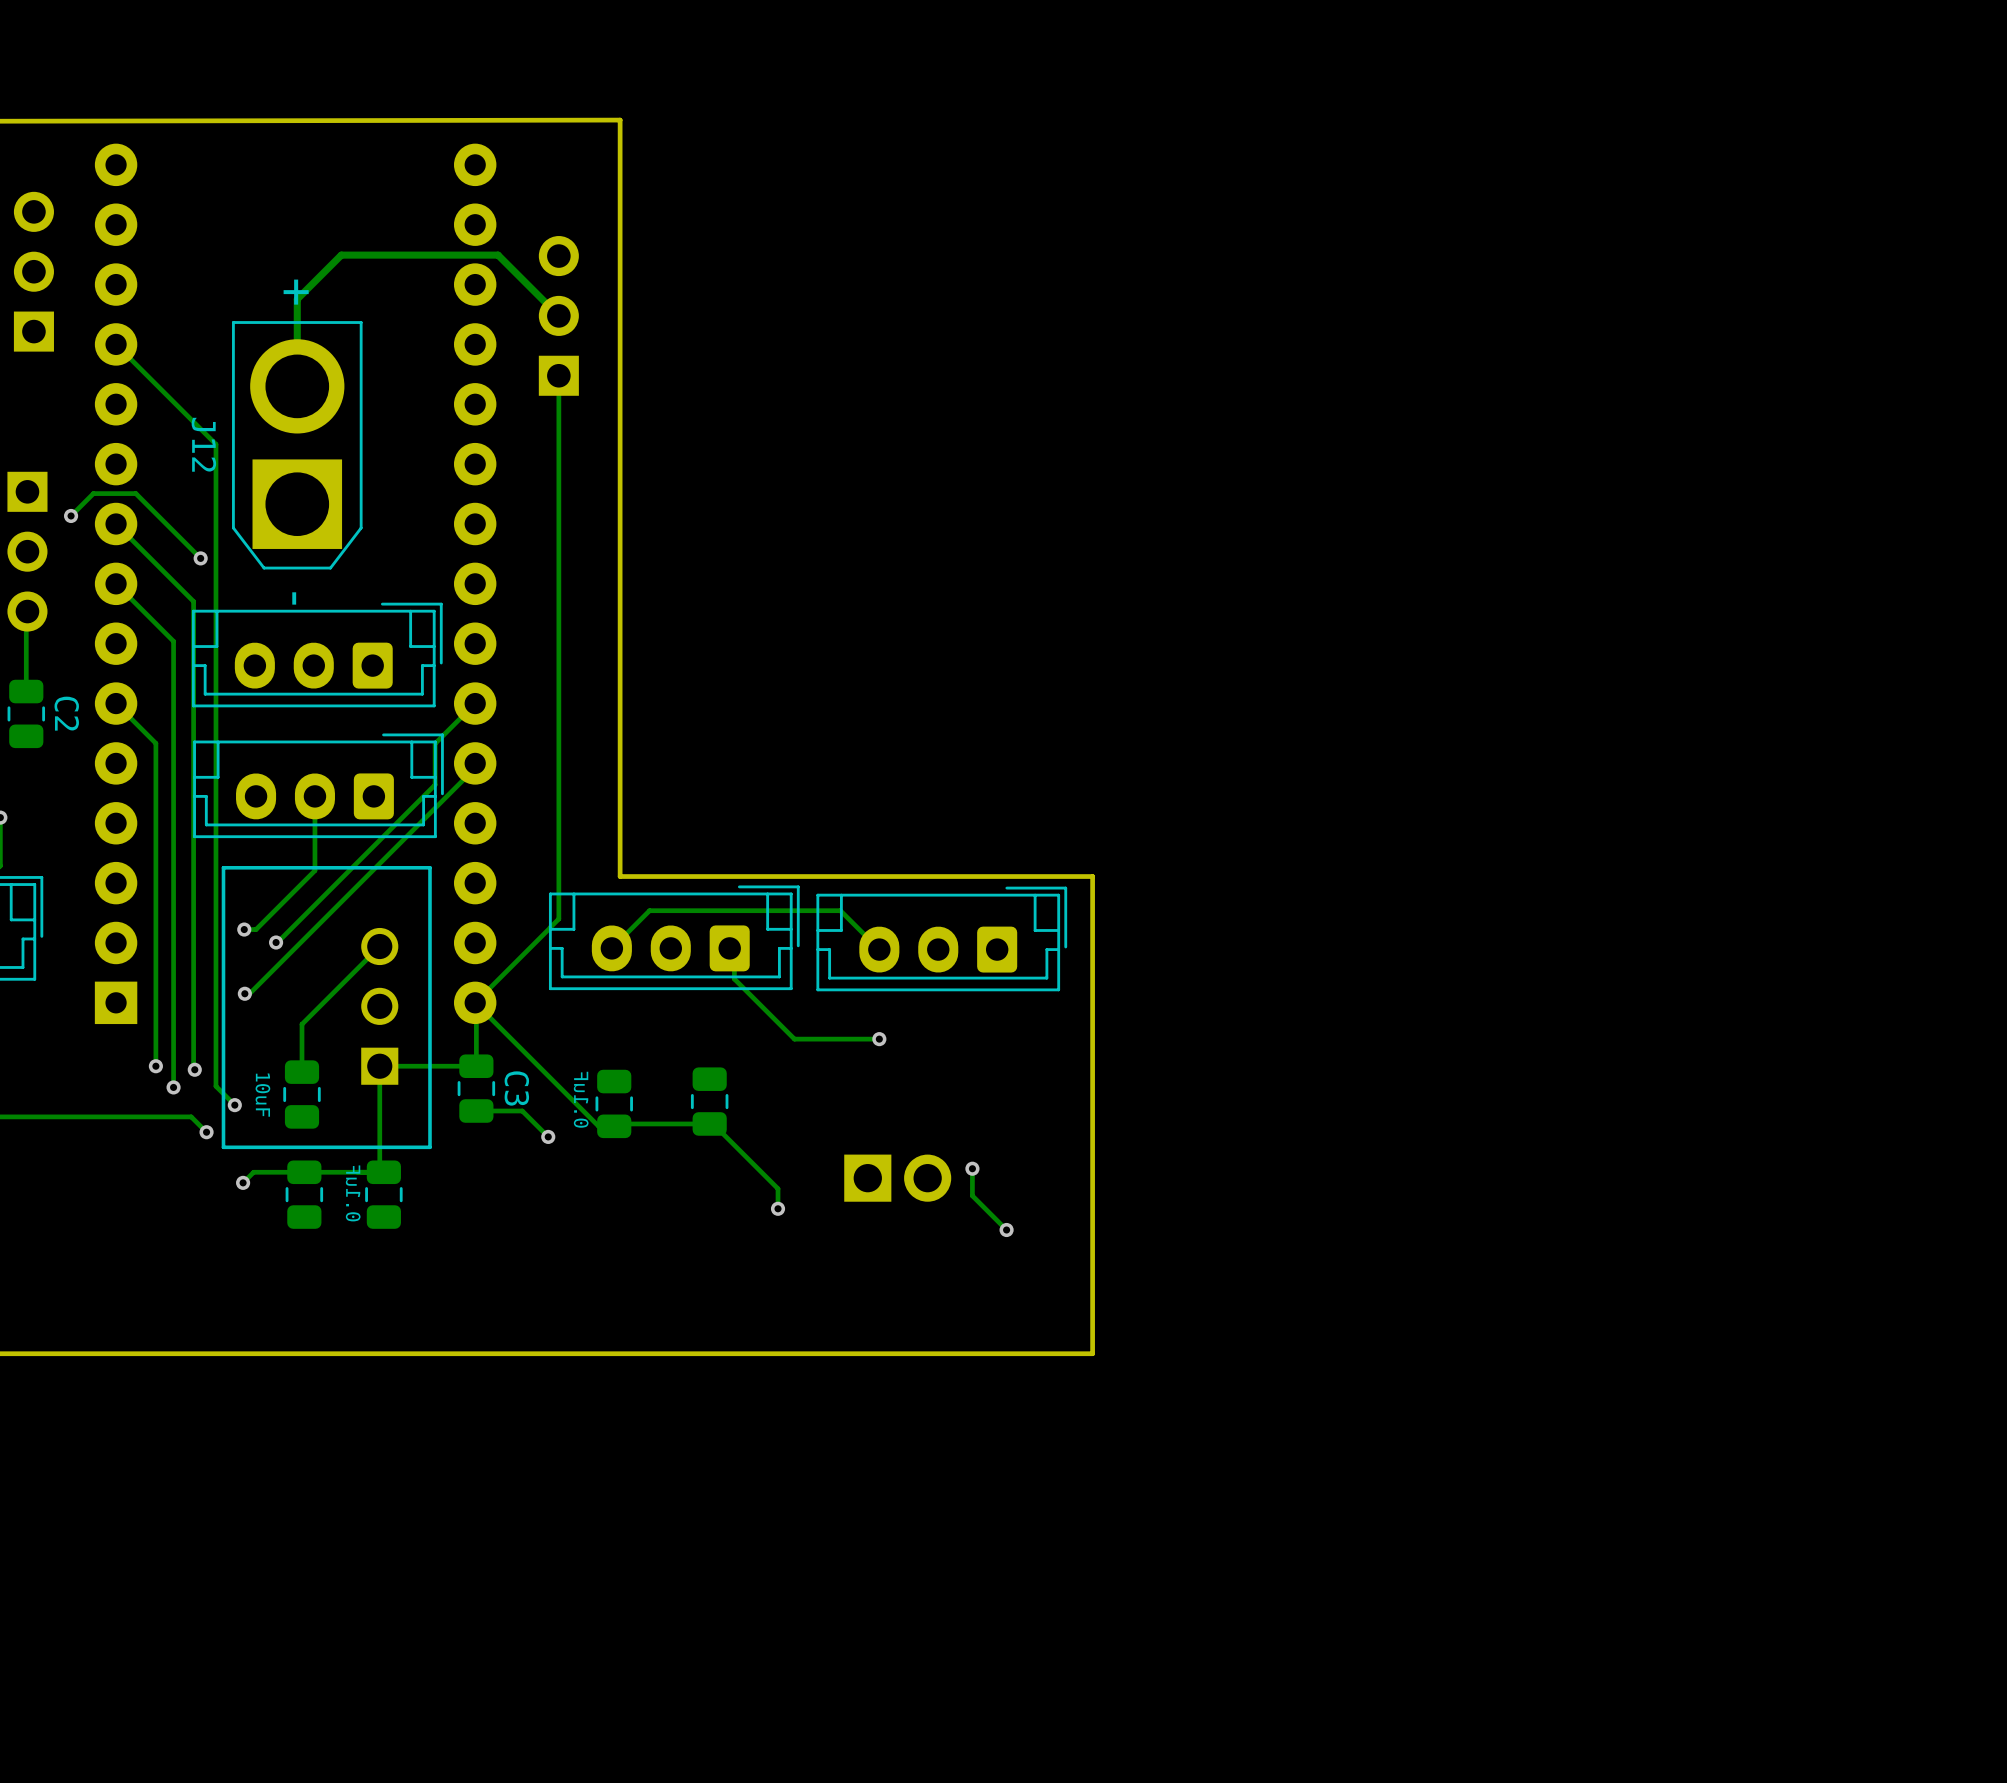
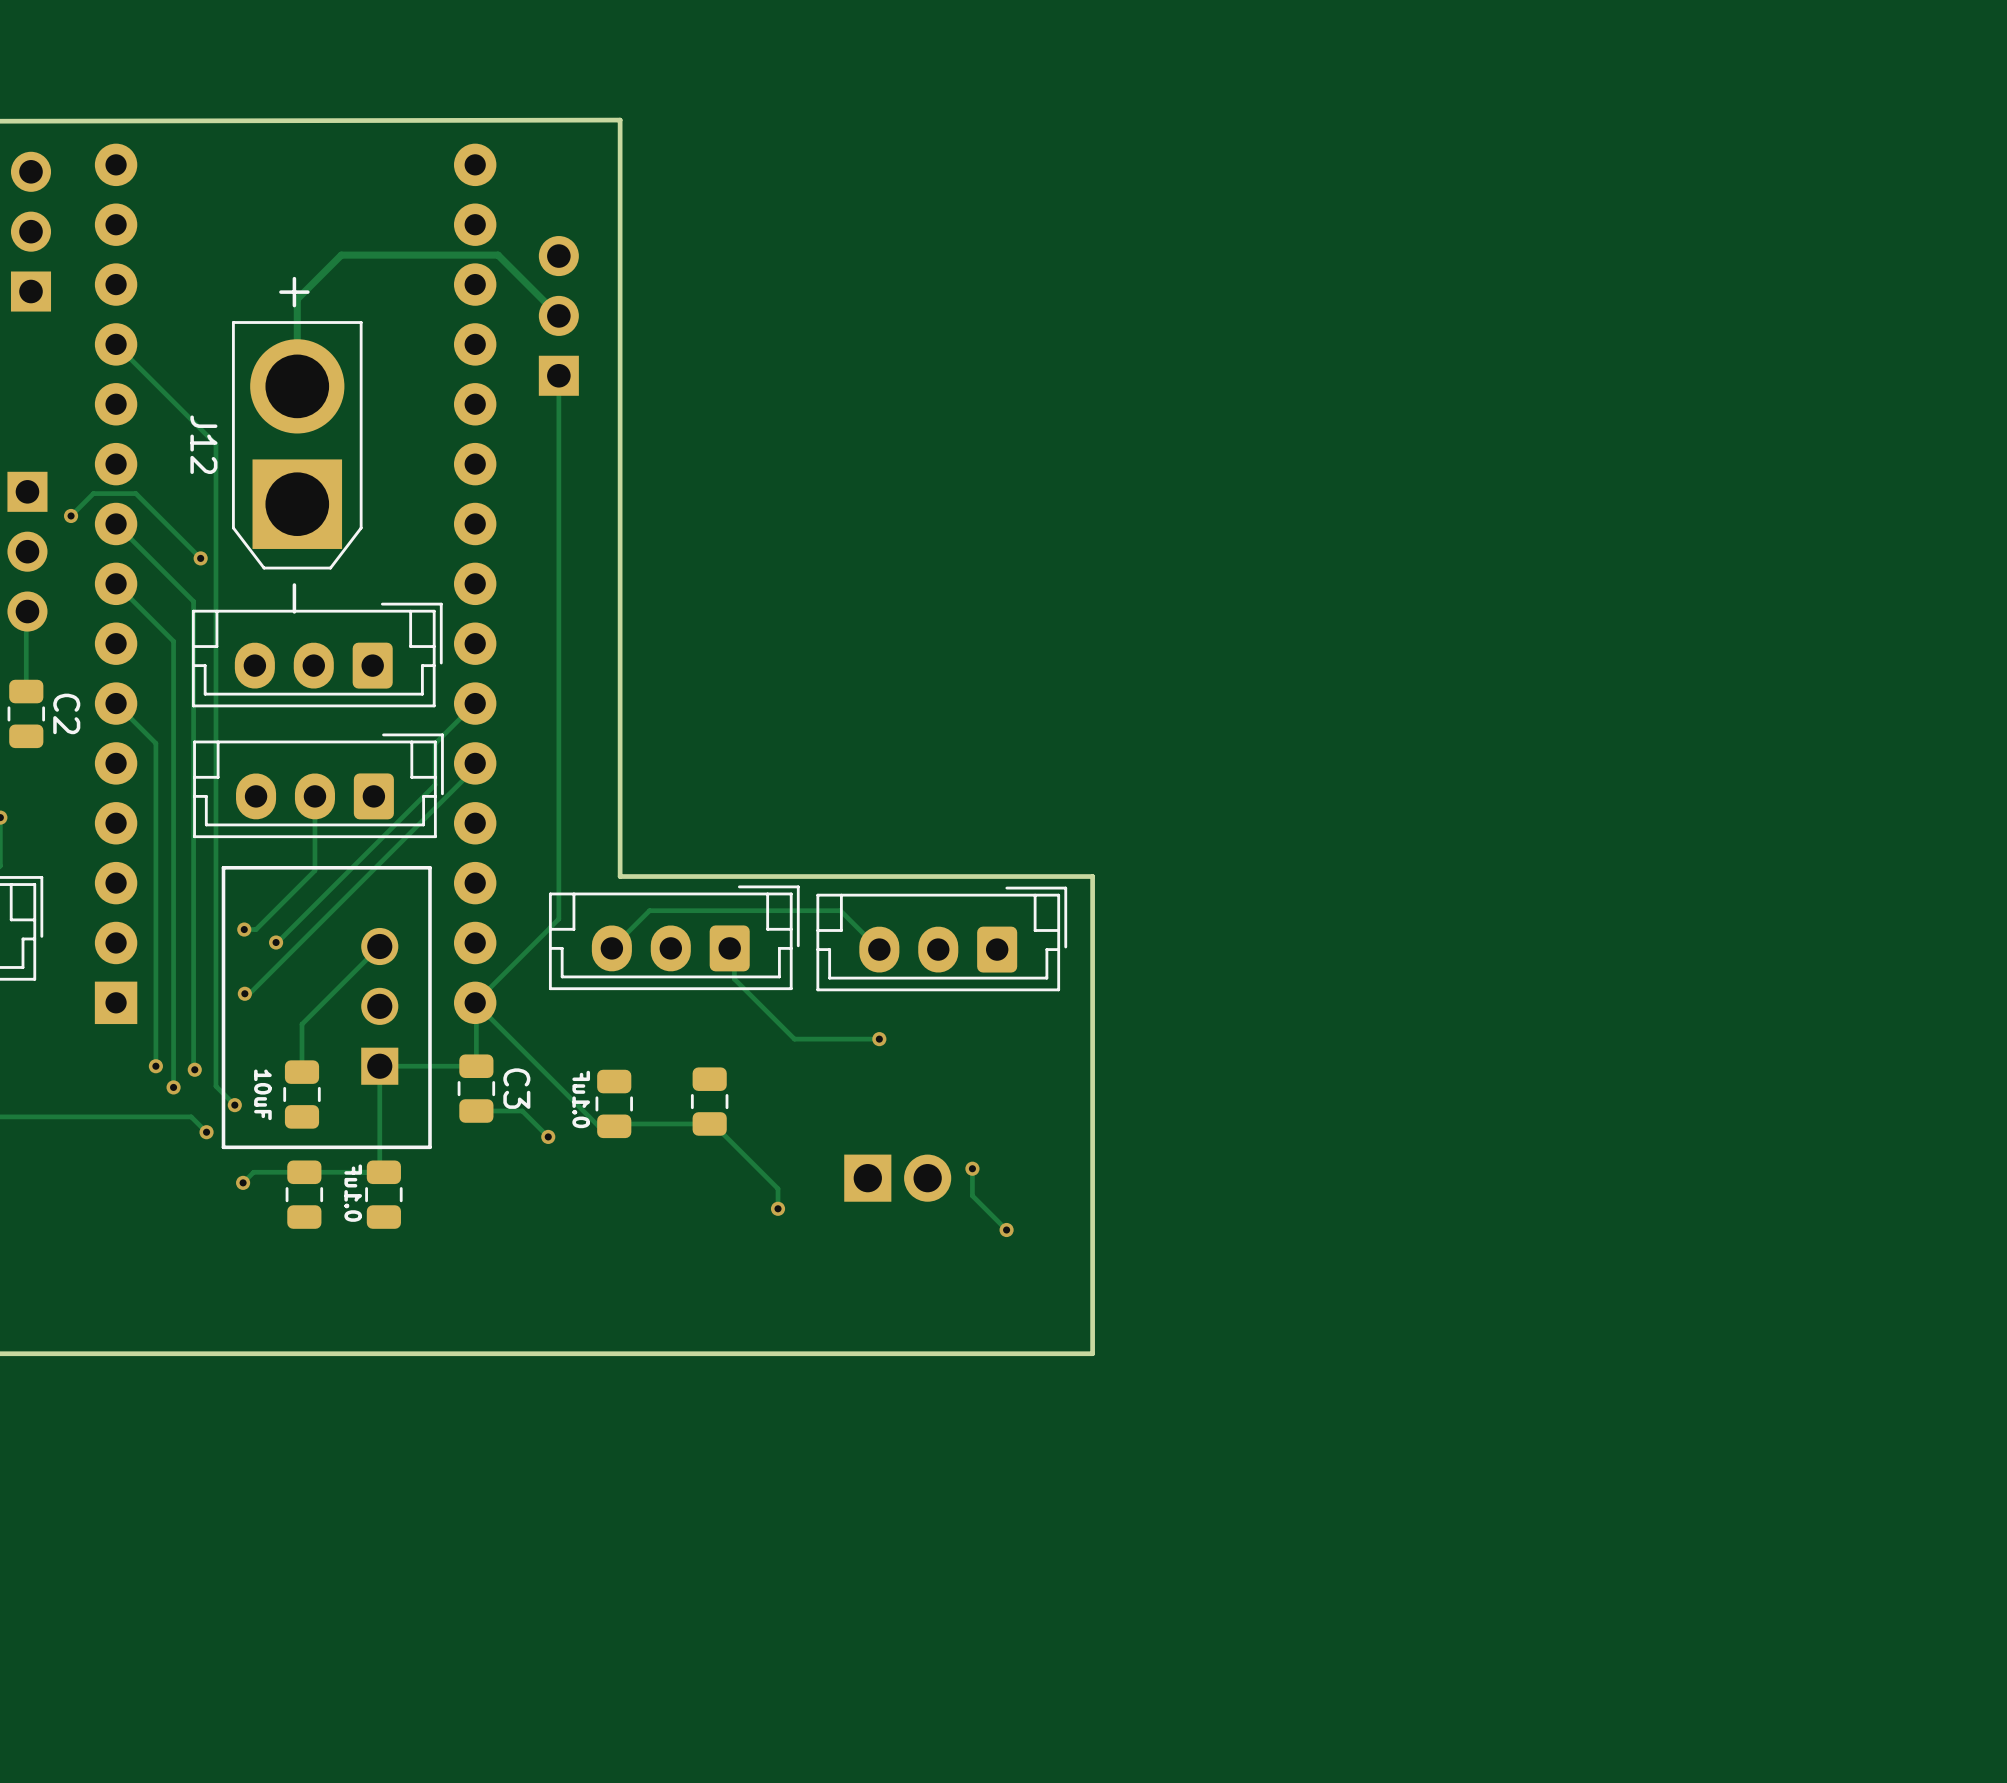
part position: (33, 271) -> (31, 231)

